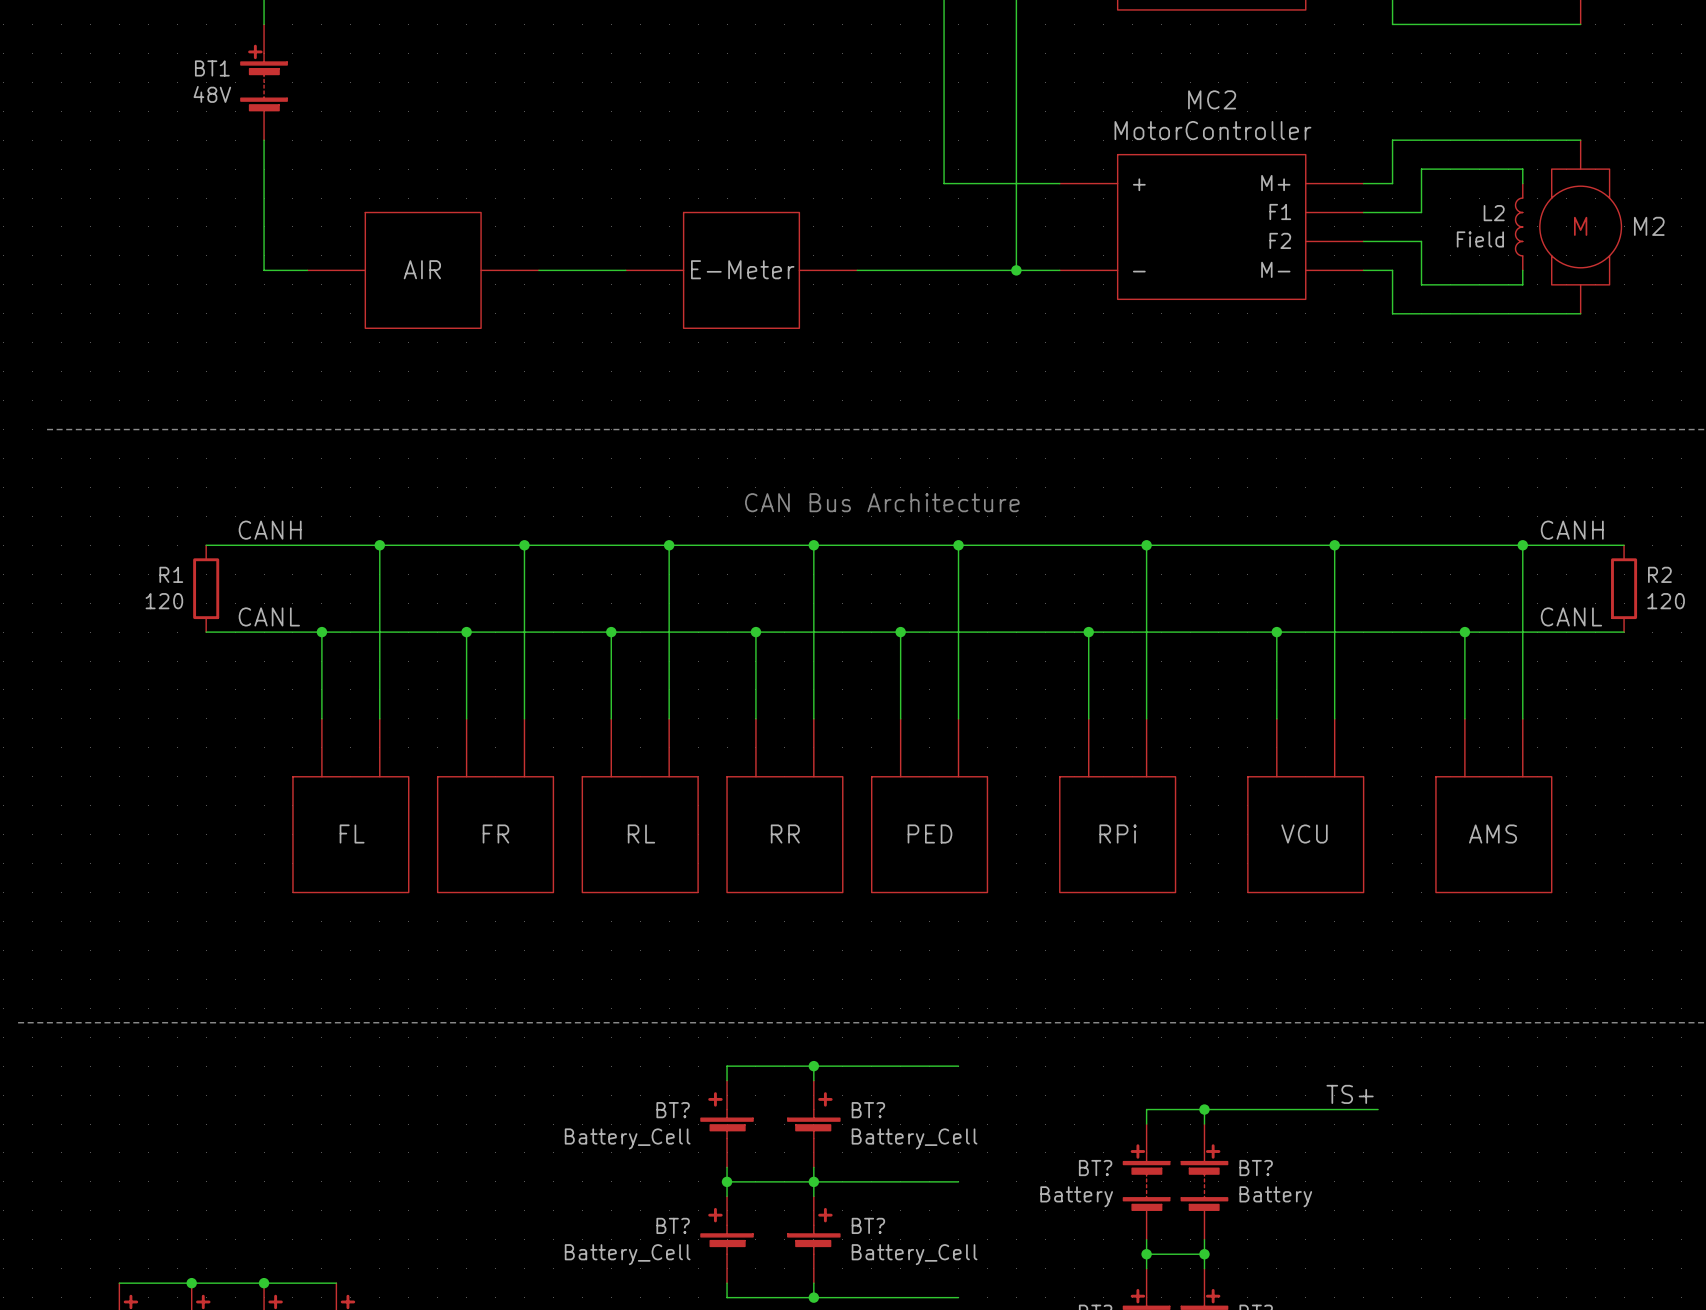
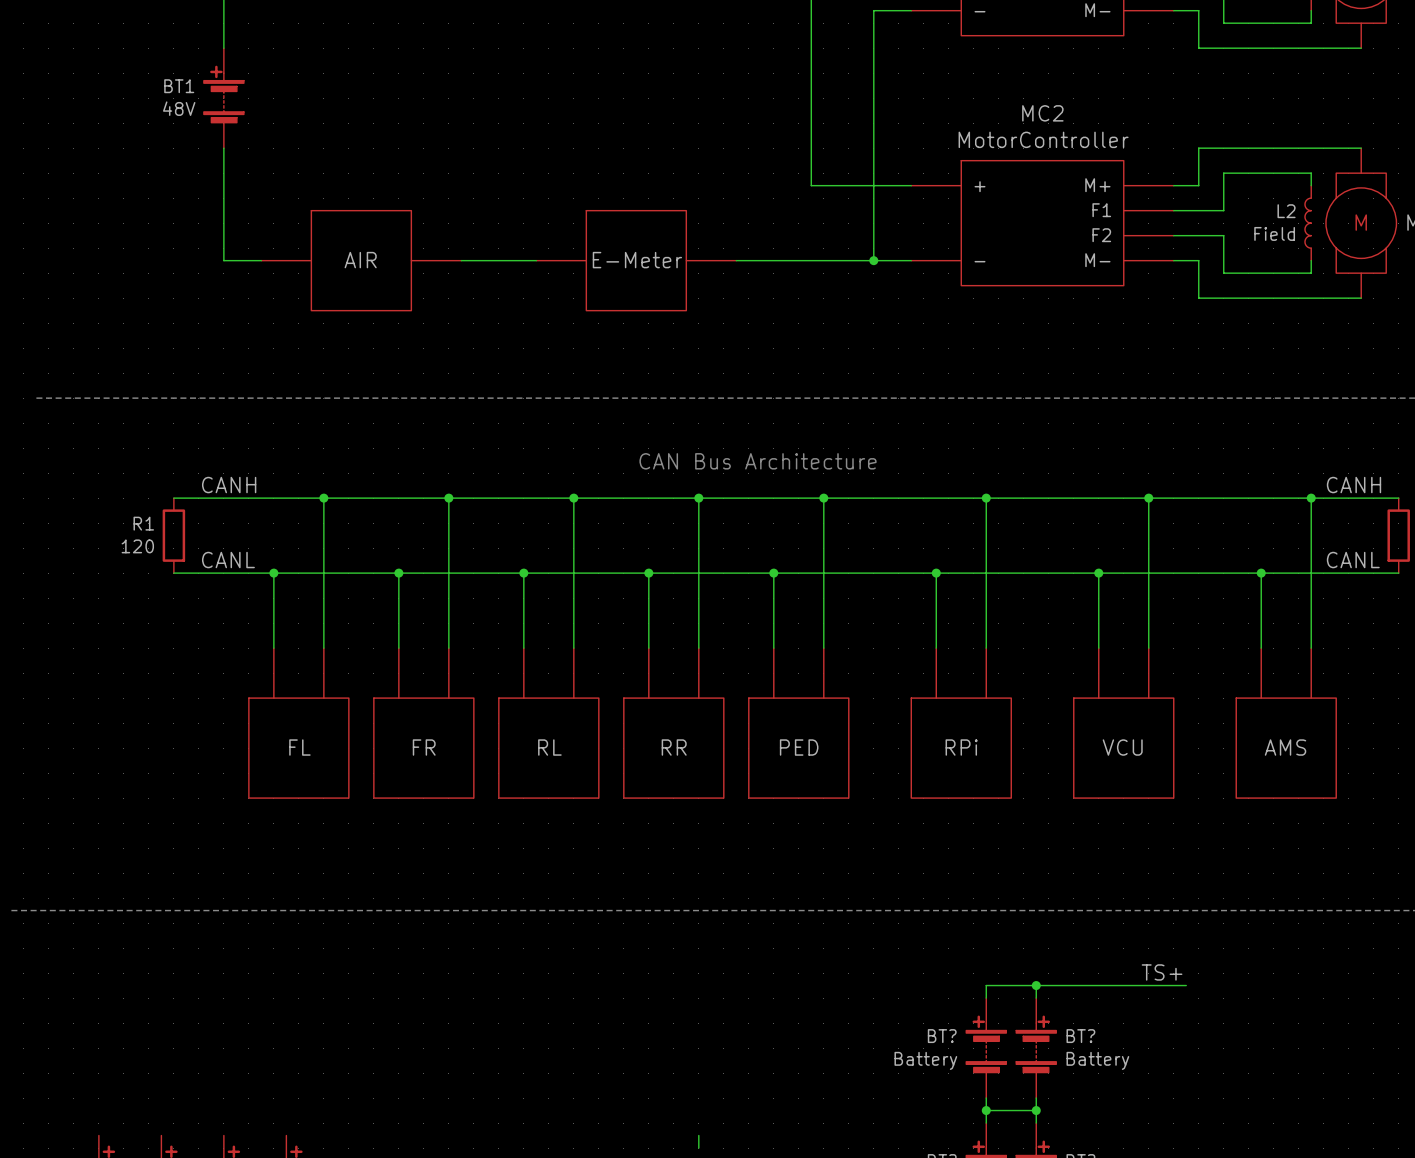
wire: (813, 1066) (813, 1080) -> none
junction: (813, 1066) -> none
wire: (958, 1066) (727, 1066) (727, 1080) -> none
BT?: Battery_Cell (727, 1124) -> none
BT?: Battery_Cell (813, 1124) -> none
wire: (727, 1167) (727, 1196) -> none
wire: (813, 1167) (813, 1196) -> none
wire: (727, 1181) (958, 1181) -> none
junction: (727, 1181) -> none
junction: (813, 1181) -> none
BT?: Battery_Cell (727, 1239) -> none
BT?: Battery_Cell (813, 1239) -> none
wire: (119, 1283) (336, 1283) -> none
junction: (191, 1283) -> none
junction: (264, 1283) -> none
wire: (727, 1283) (727, 1297) (958, 1297) -> none
junction: (813, 1297) -> none

